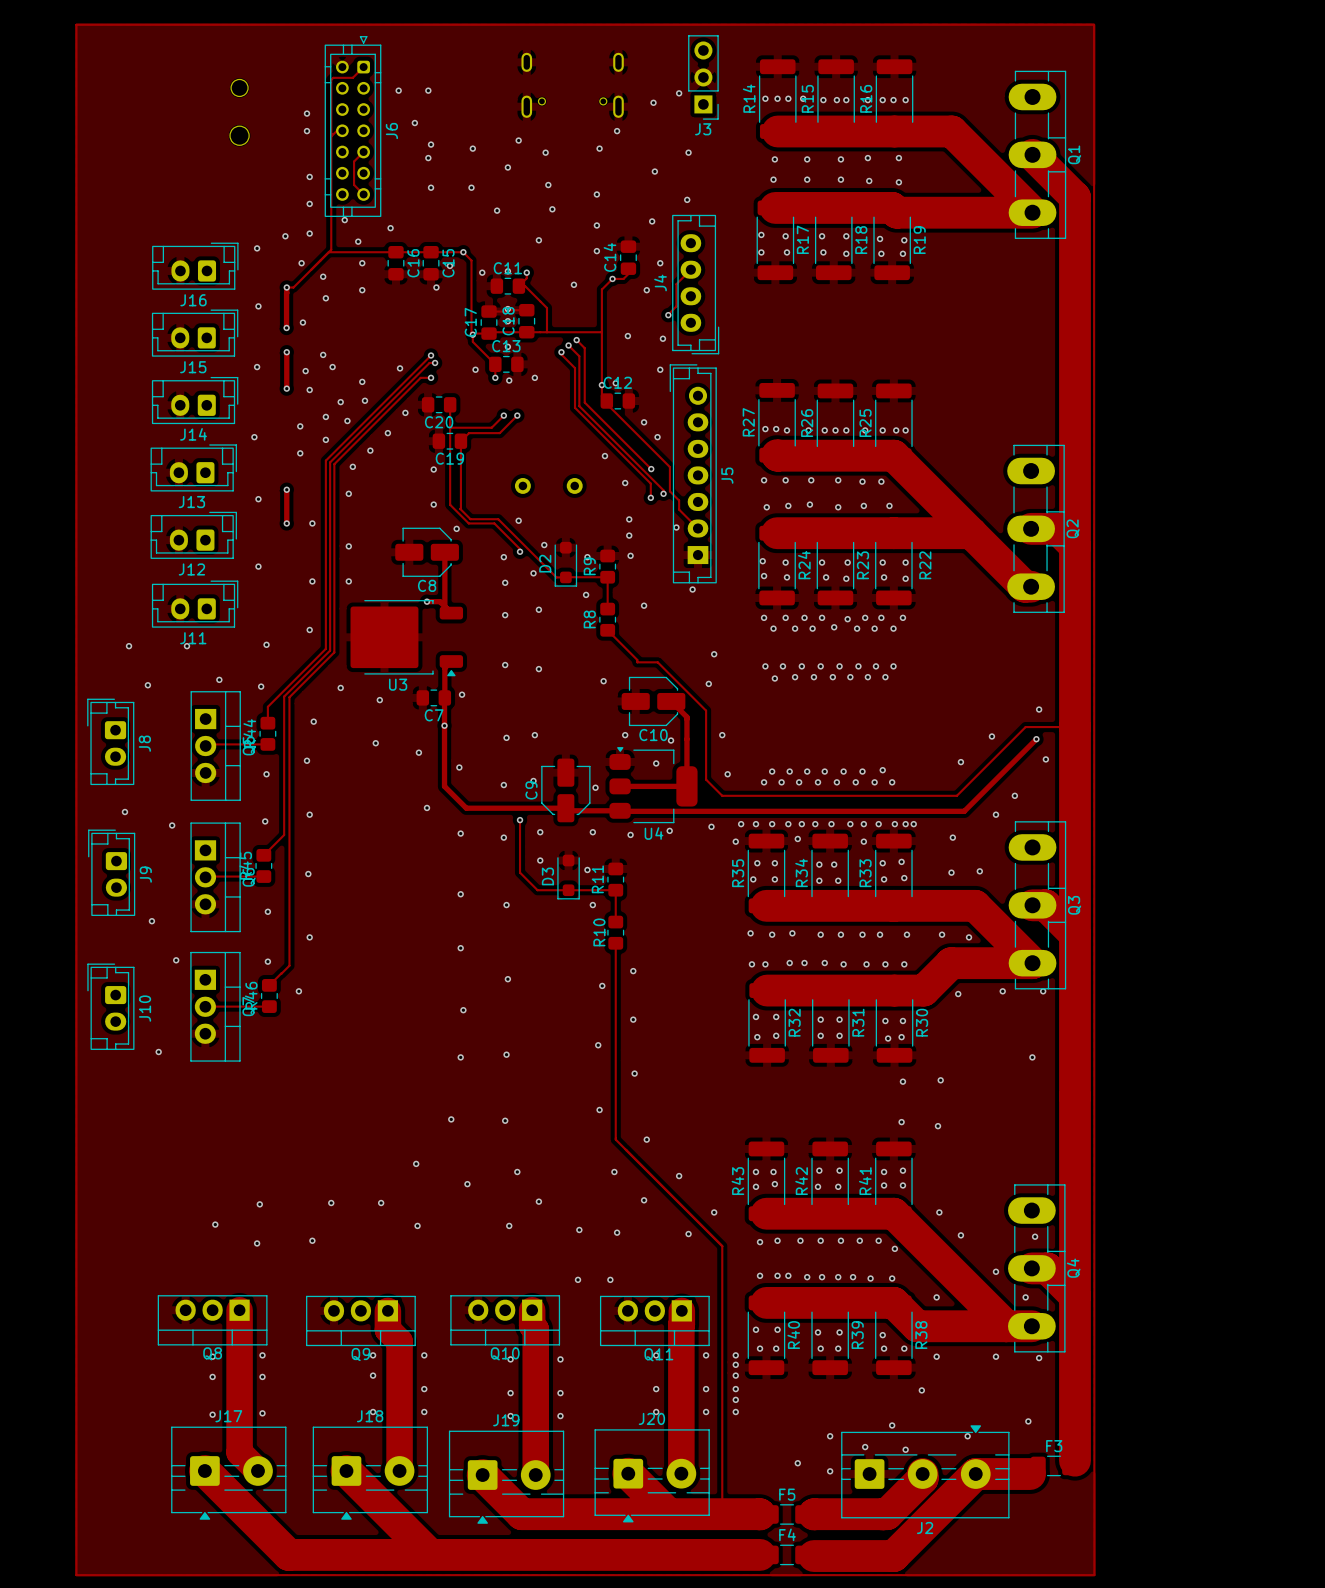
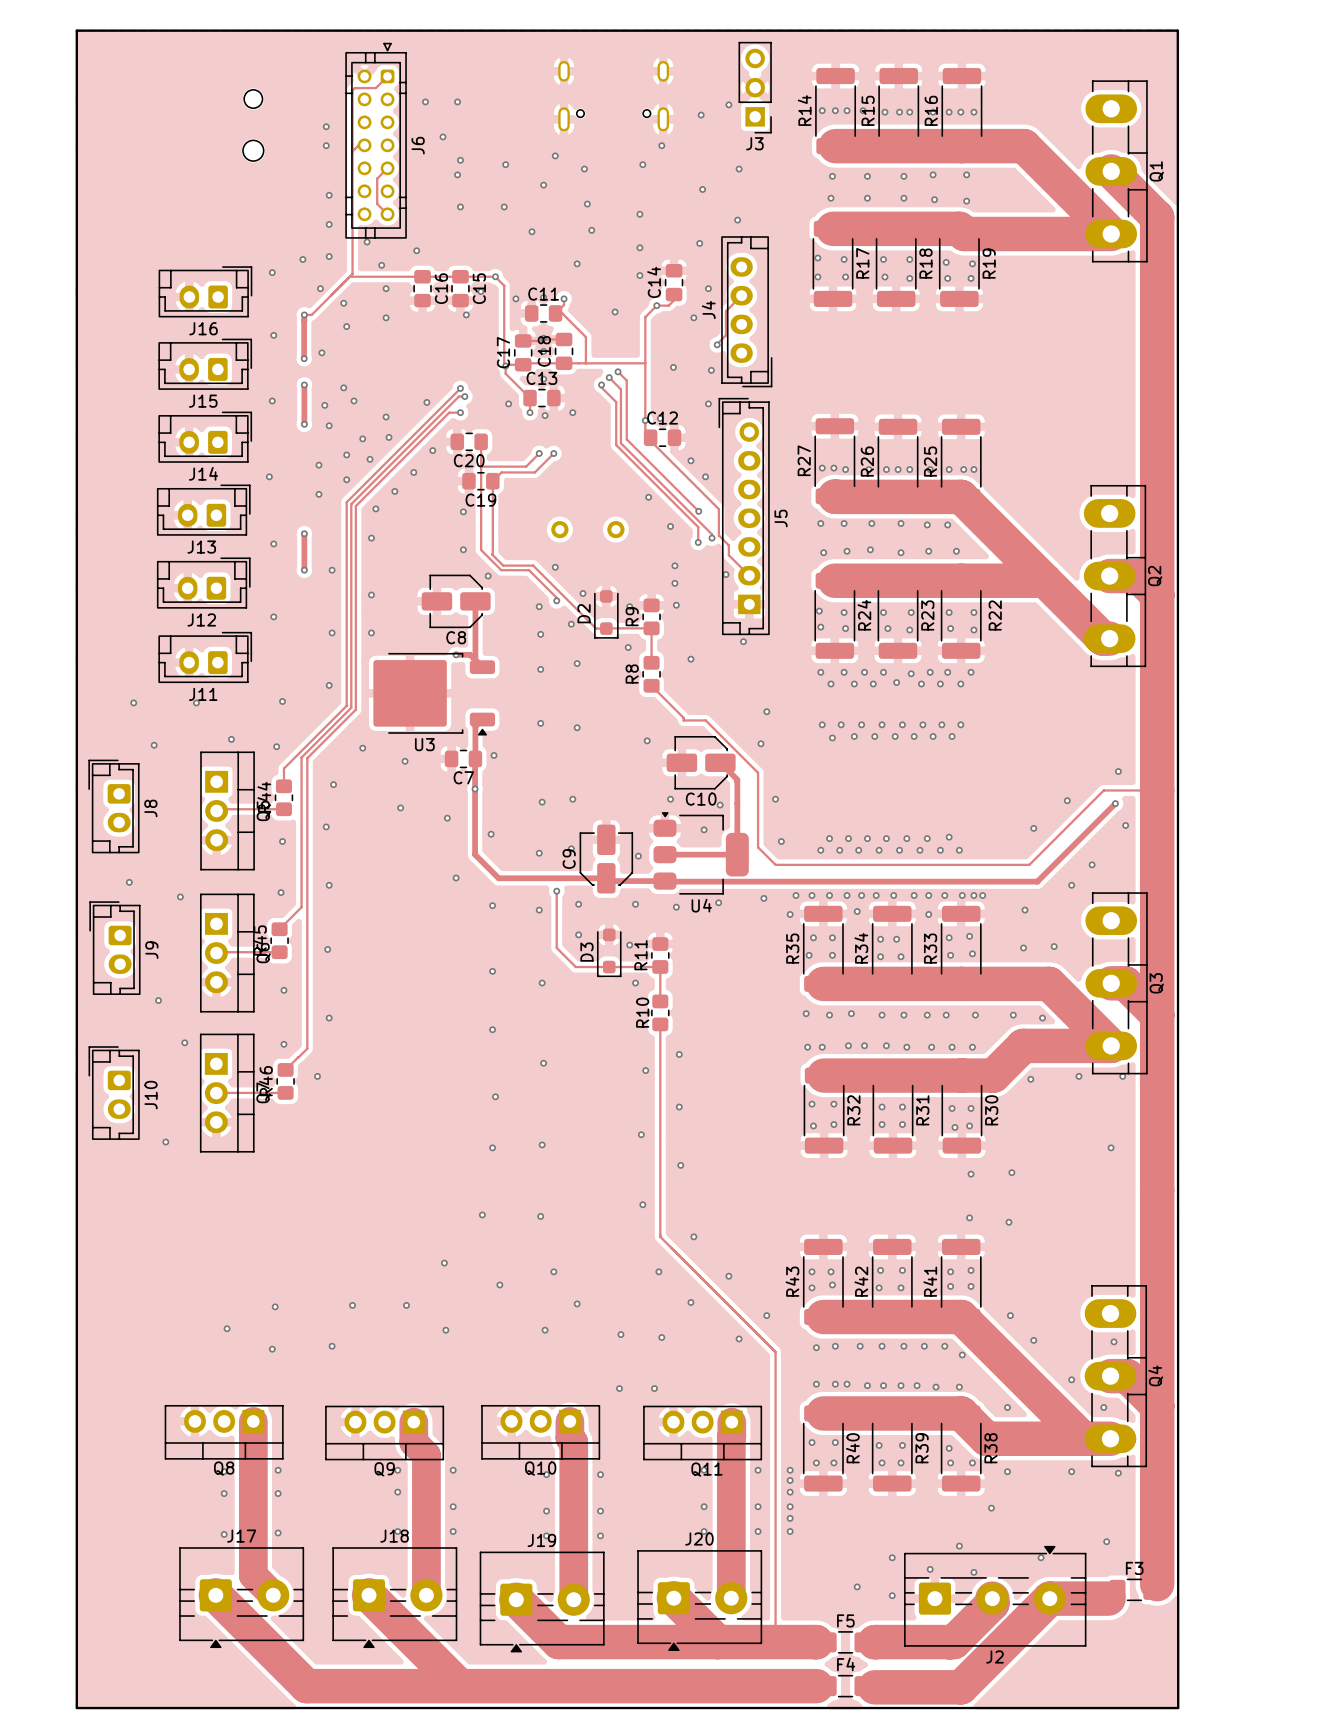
track: (76, 24) (1094, 24) (1094, 1575) (76, 1575) (76, 24) -> none
board edge: none -> (76, 30) (1177, 30) (1178, 1708) (76, 1708) (76, 30)

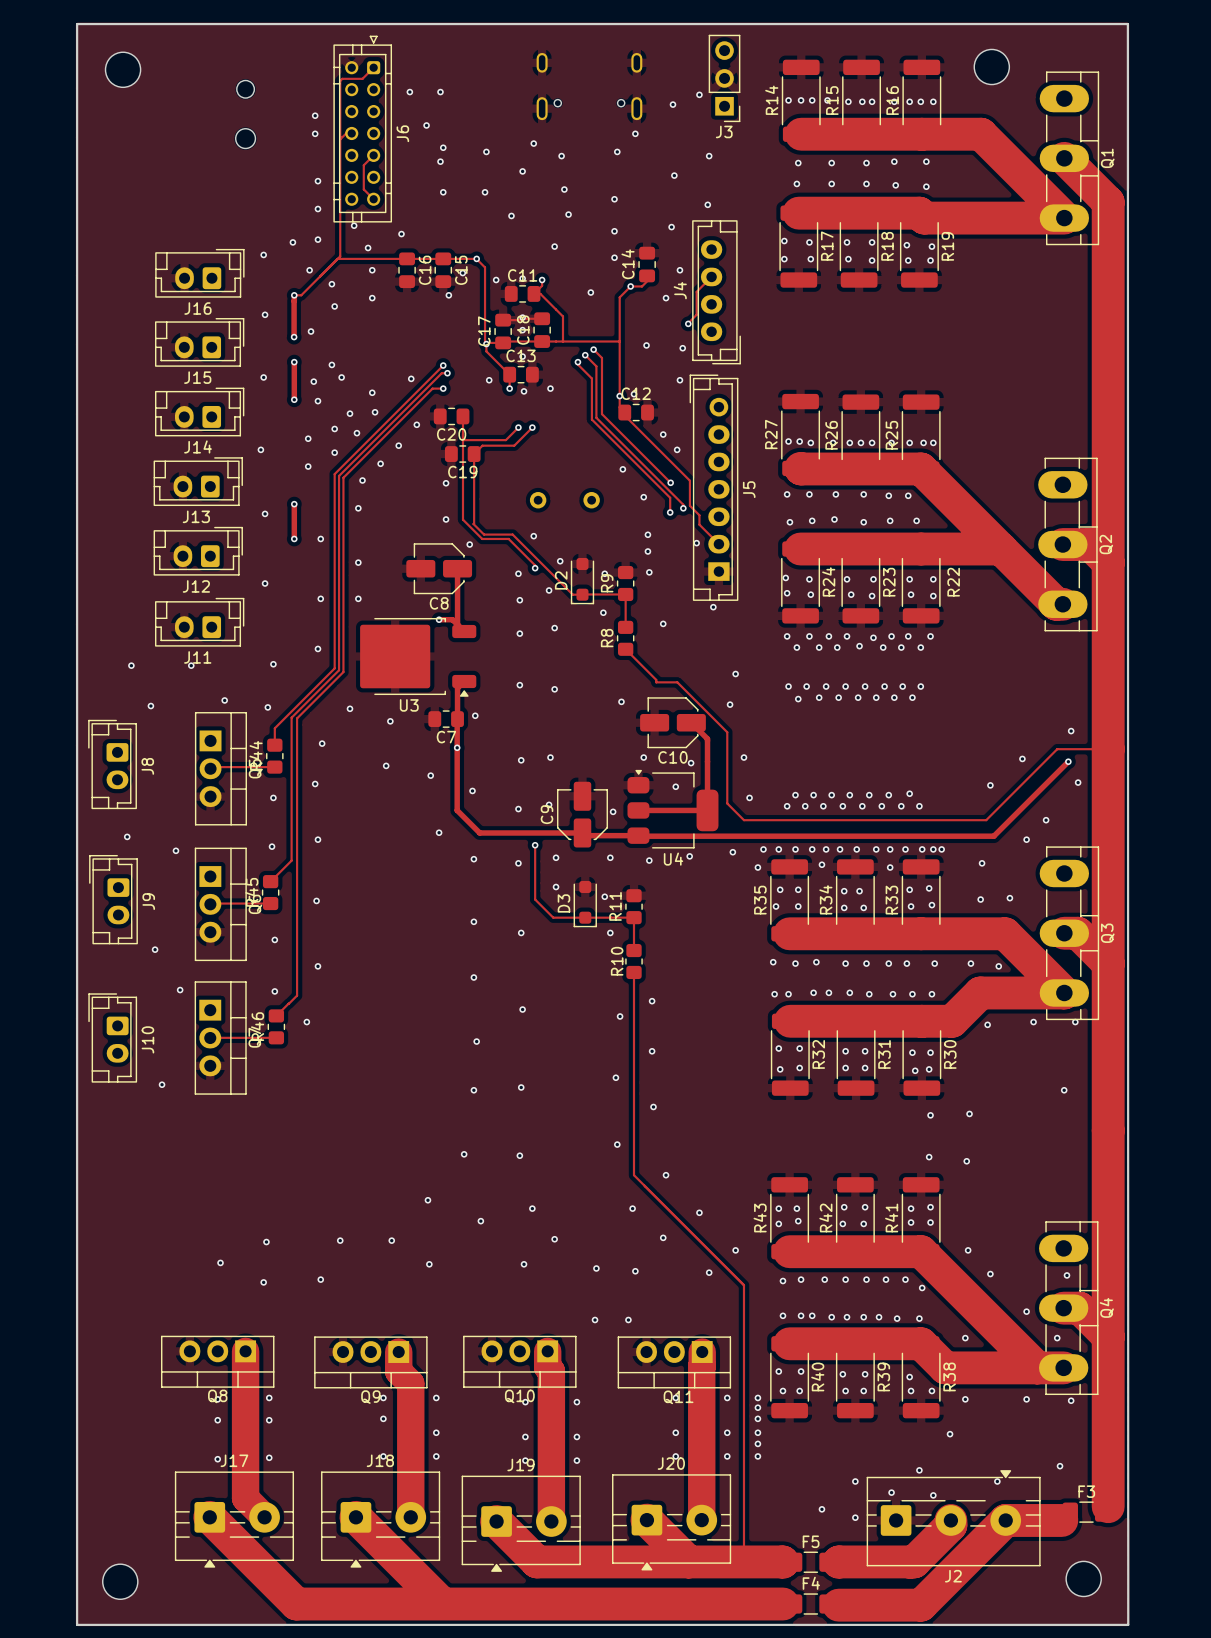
part: none -> (991, 67)
part: none -> (123, 69)
part: none -> (1083, 1578)
part: none -> (120, 1581)

